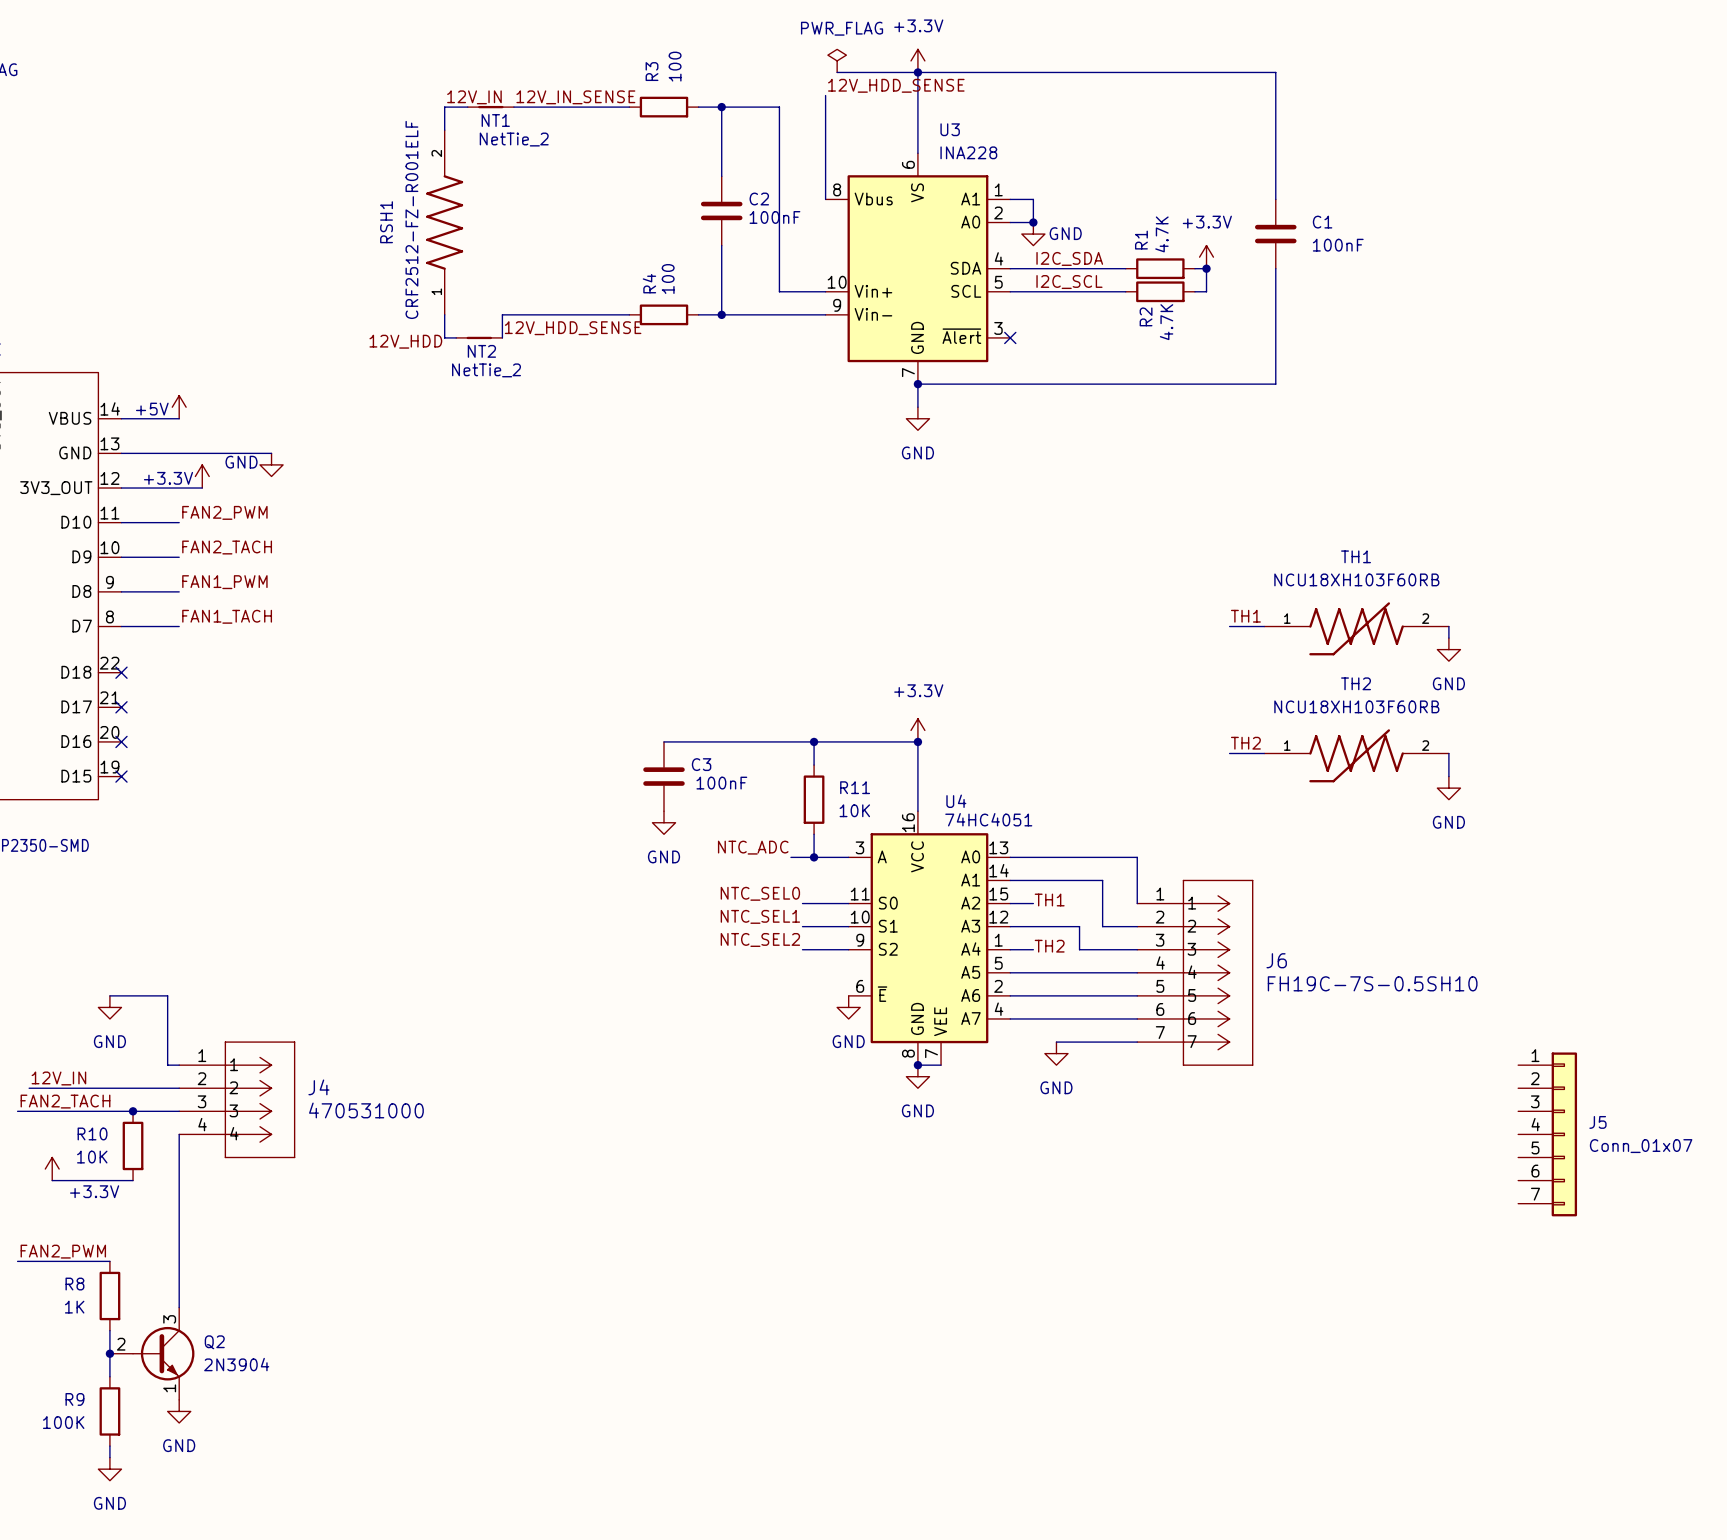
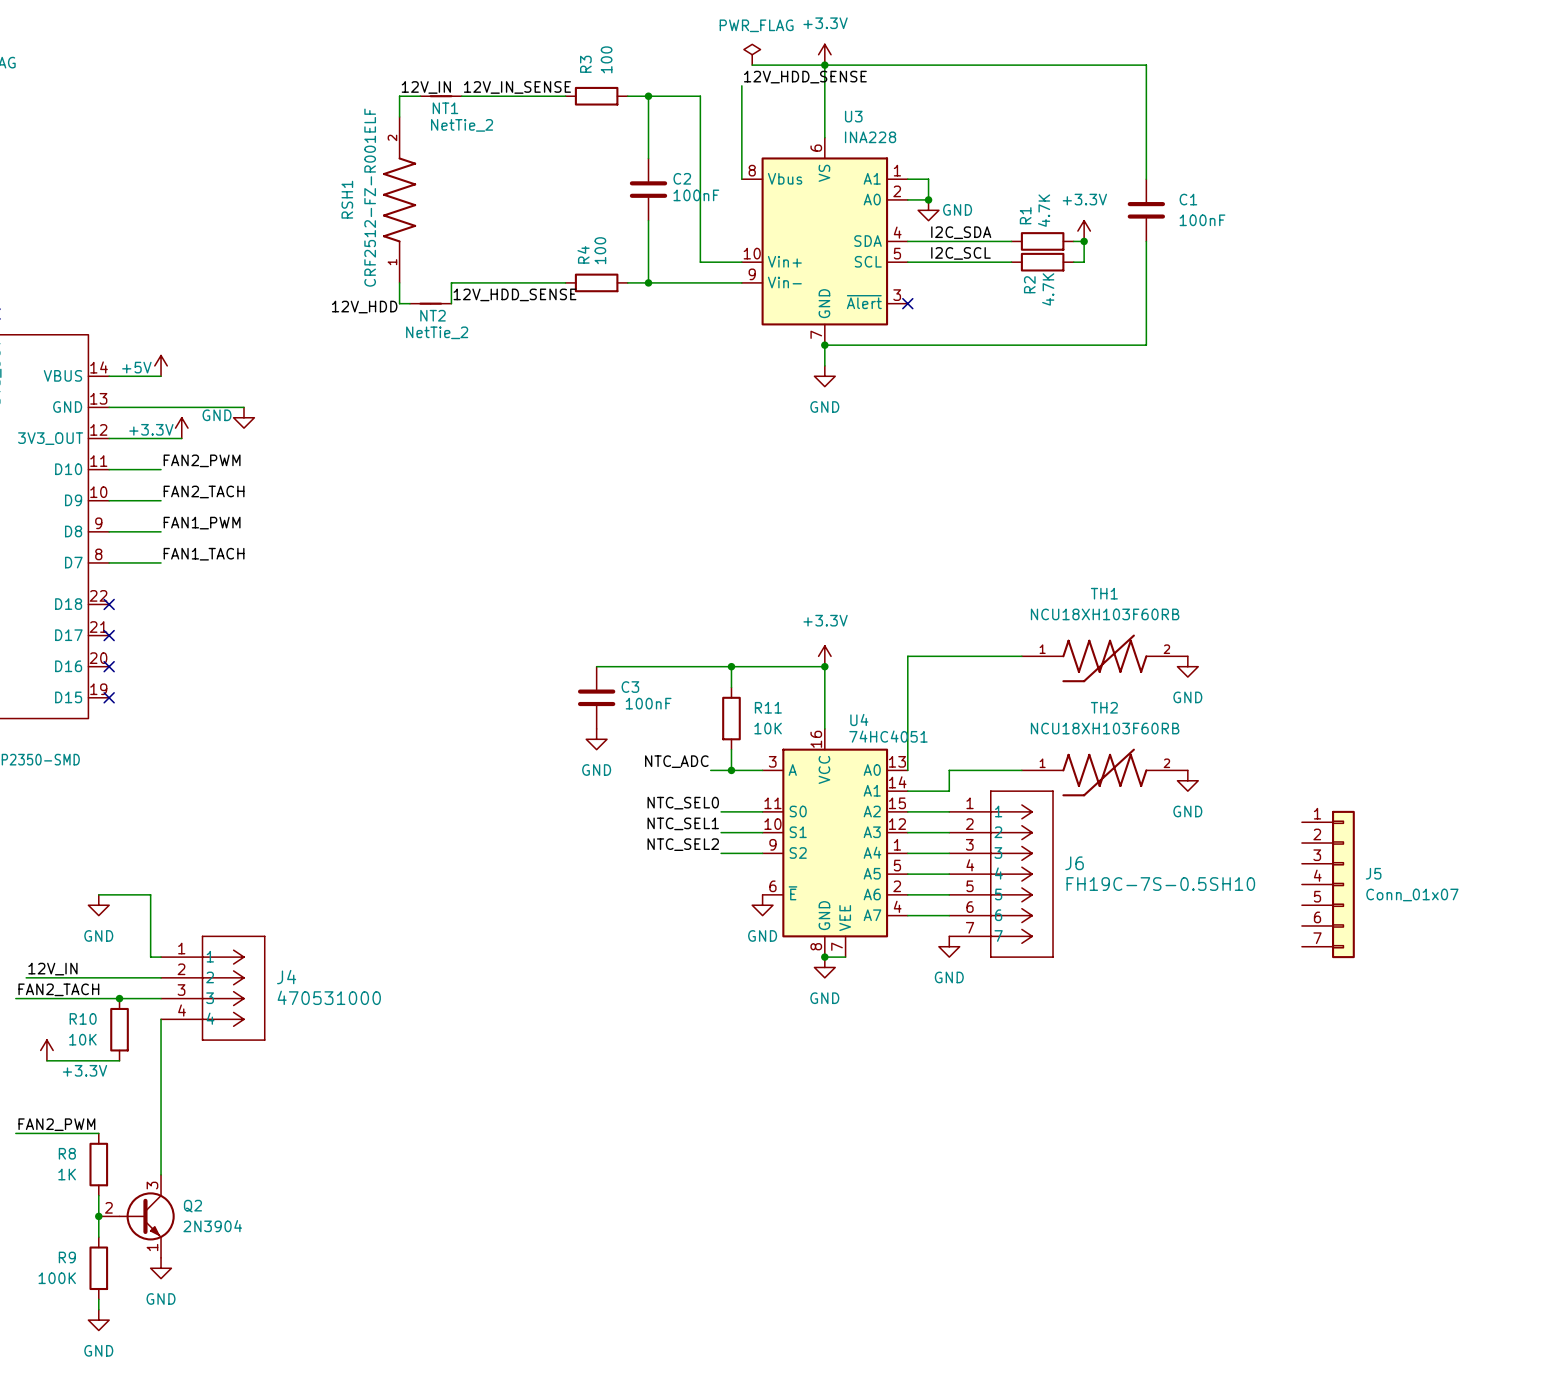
label: TH1 (1245, 616) -> none
wire: (1229, 626) (1264, 626) -> none
wire: (1448, 626) (1448, 638) -> none
TH1 position: (1356, 628) -> (1104, 658)
power symbol: GND (1448, 649) -> none
wire: none -> (1021, 656) (907, 656) (907, 770)
power symbol: none -> GND (1187, 666)
label: TH2 (1245, 743) -> none
wire: (1229, 753) (1264, 753) -> none
wire: (1448, 753) (1448, 776) -> none
TH2 position: (1356, 755) -> (1104, 772)
power symbol: GND (1448, 788) -> none
wire: (1010, 857) (1056, 857) -> (949, 791) (949, 770)
wire: (1137, 857) (1137, 903) -> none
power symbol: none -> GND (1187, 780)
wire: (1056, 880) (1102, 880) (1102, 926) (1137, 926) -> none
label: TH1 (1049, 900) -> none
wire: none -> (928, 811) (949, 811)
label: TH2 (1049, 946) -> none
wire: none -> (928, 853) (949, 853)
J6 position: (1195, 972) -> (1001, 874)
J5 position: (1547, 1134) -> (1328, 884)

